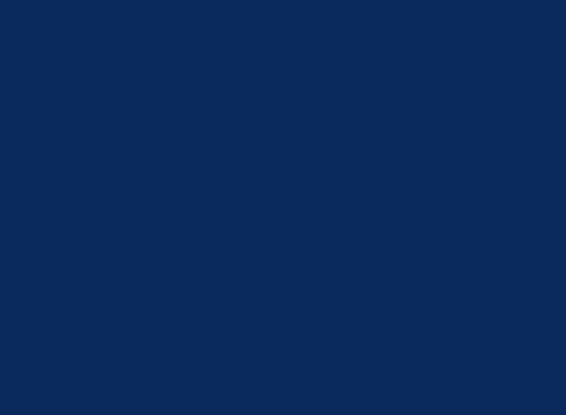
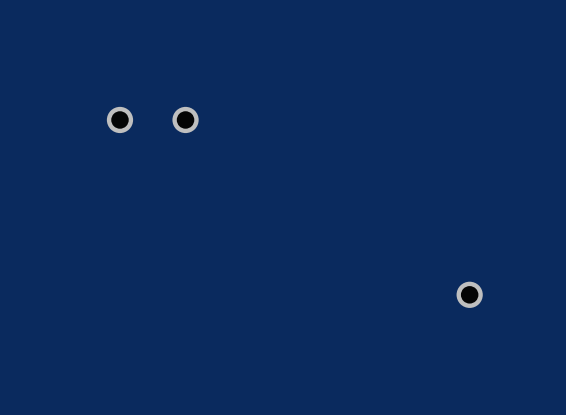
via: none -> (119, 119)
via: none -> (185, 119)
via: none -> (469, 294)

